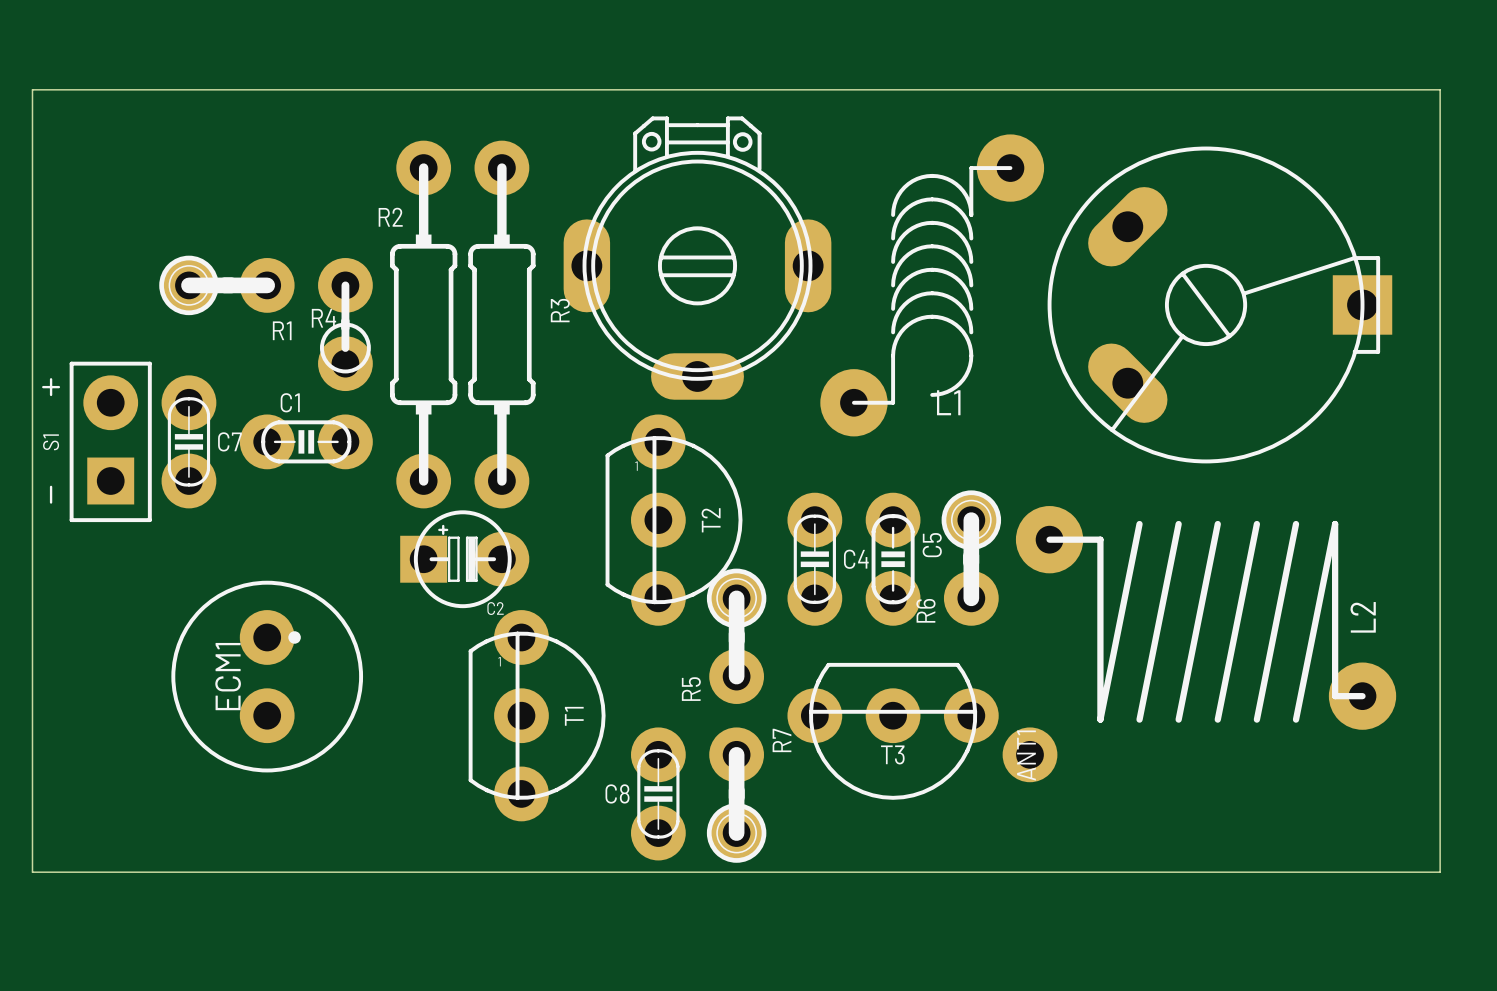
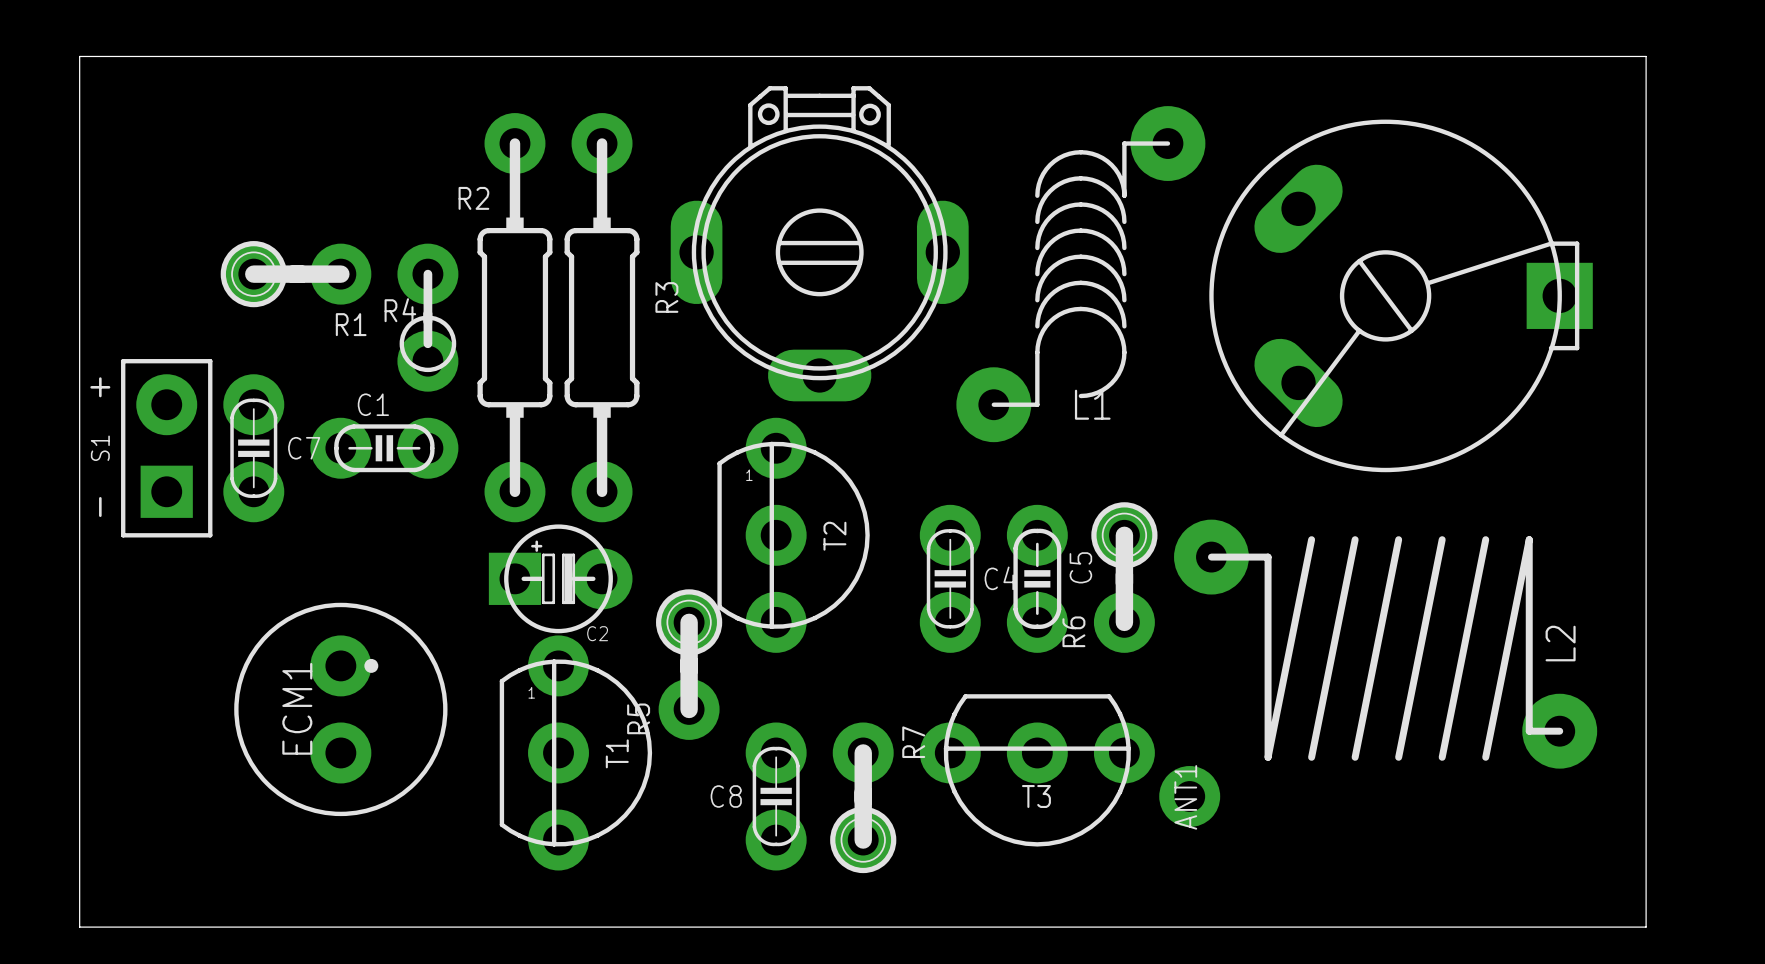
R5 position: (736, 636) -> (689, 664)
T1 position: (537, 715) -> (575, 752)
C8 position: (658, 793) -> (776, 796)
R7 position: (736, 795) -> (863, 797)

